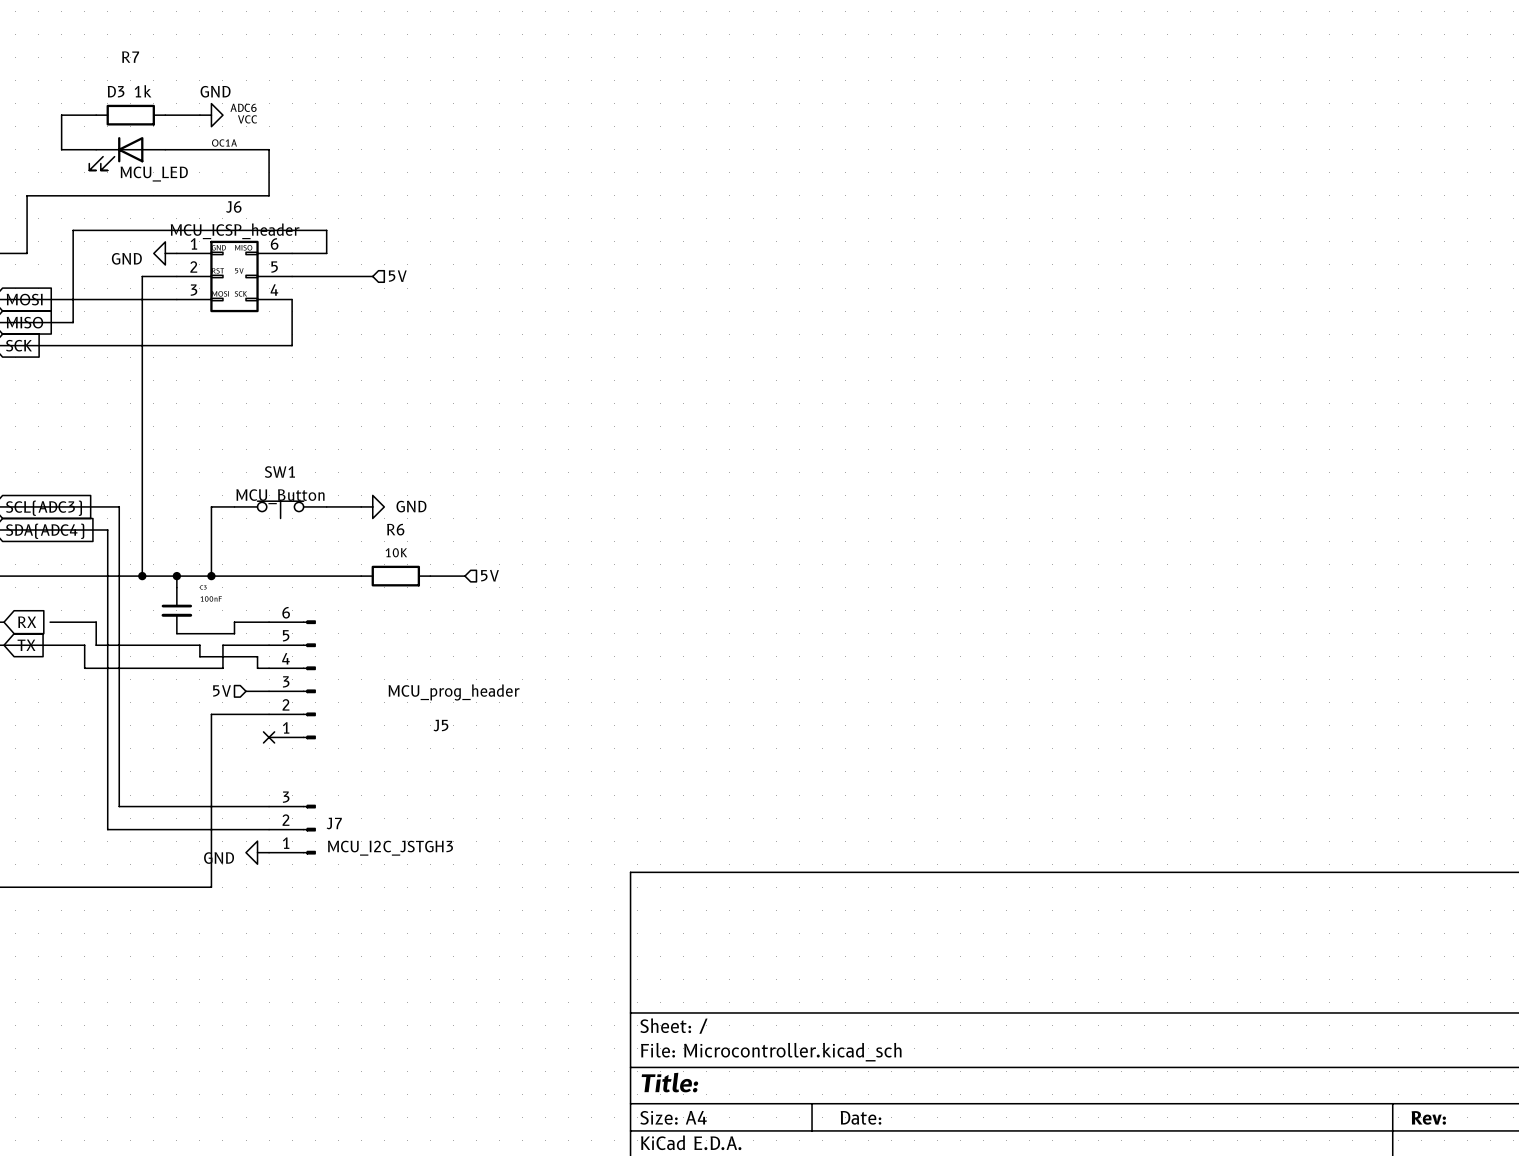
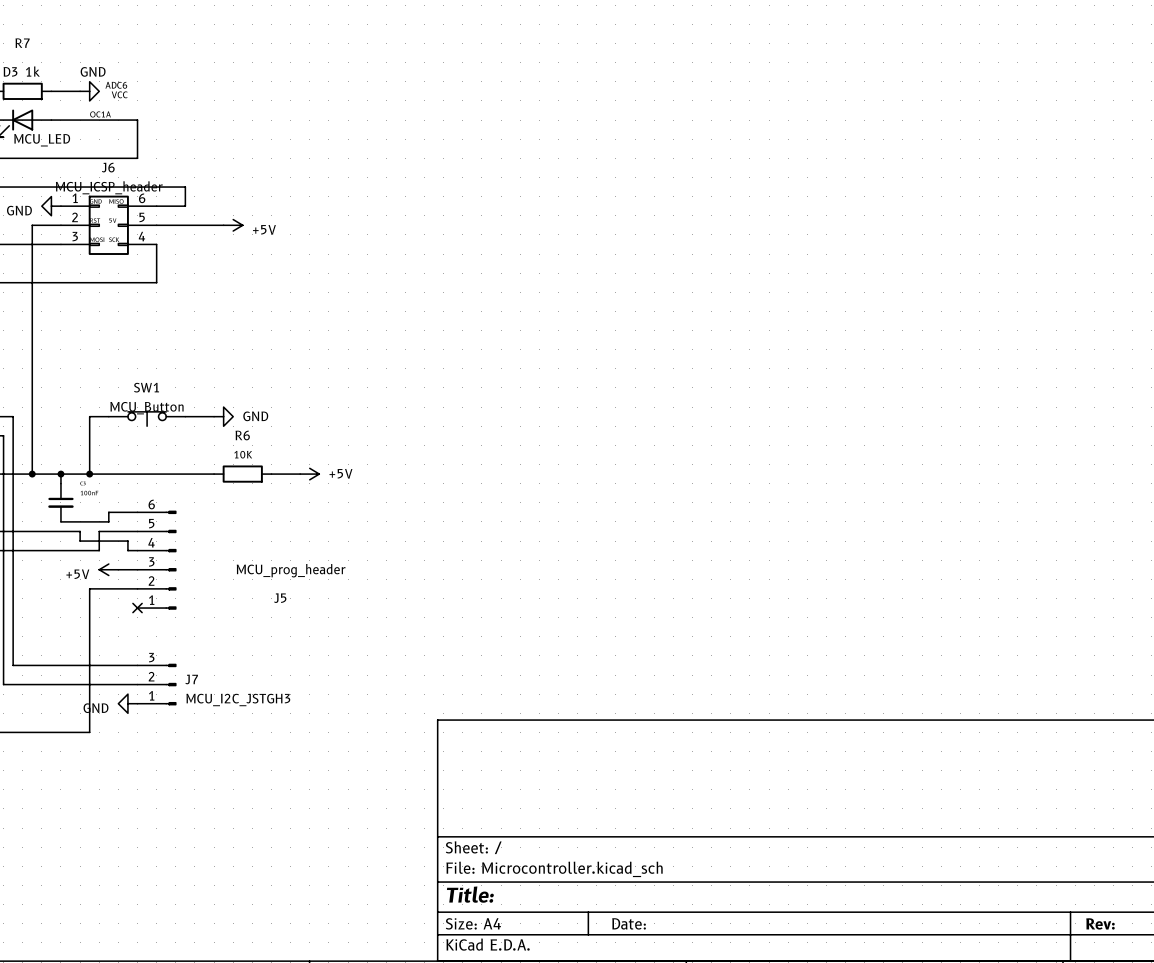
power symbol: none -> +5V (233, 225)
hierarchical label: 5V (397, 276) -> none
hierarchical label: 5V (489, 575) -> none
power symbol: none -> +5V (309, 474)
hierarchical label: 5V (222, 690) -> none
power symbol: none -> +5V (108, 569)

